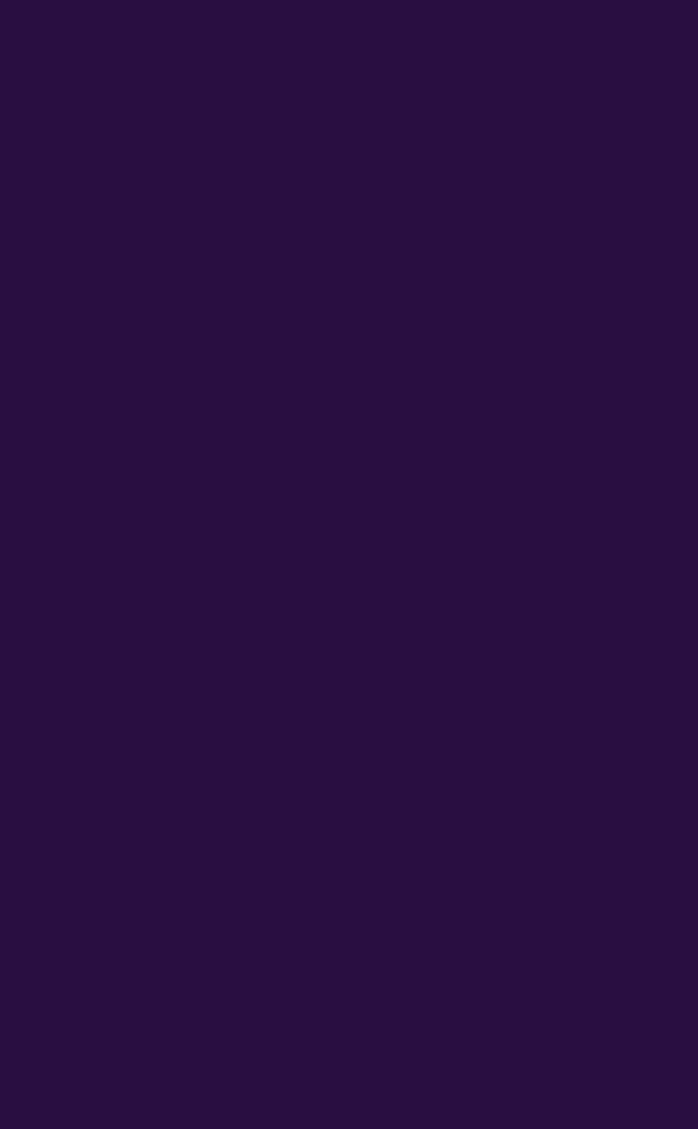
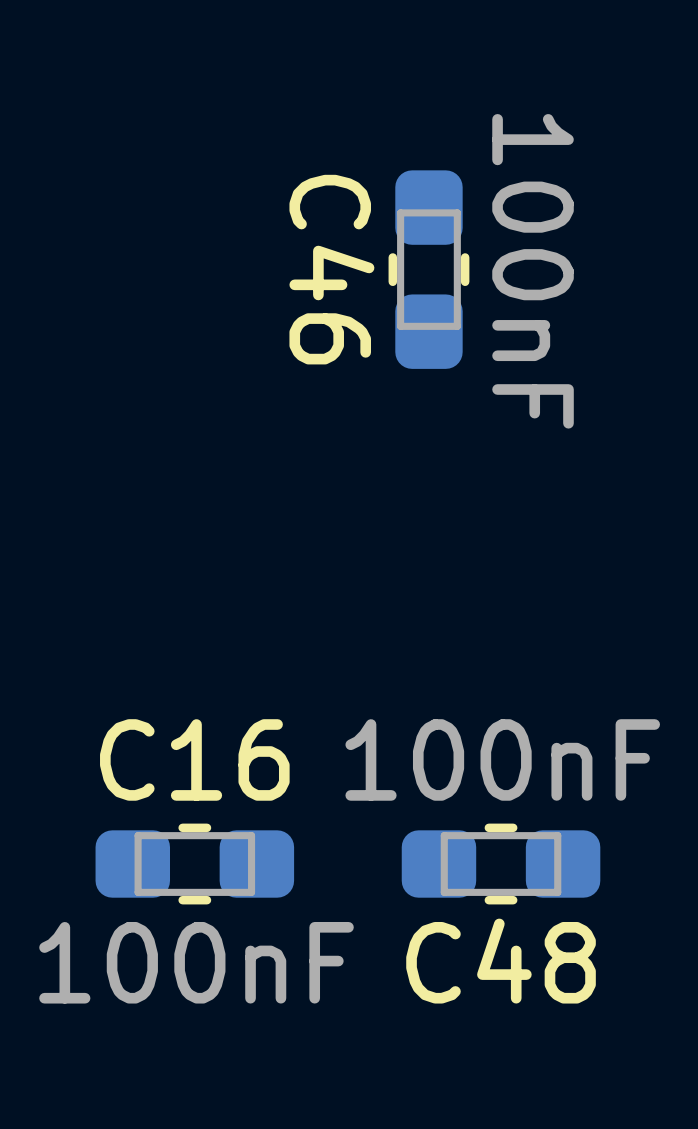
C46: none -> 100nF (428, 269)
C16: none -> 100nF (194, 864)
C48: none -> 100nF (501, 864)

